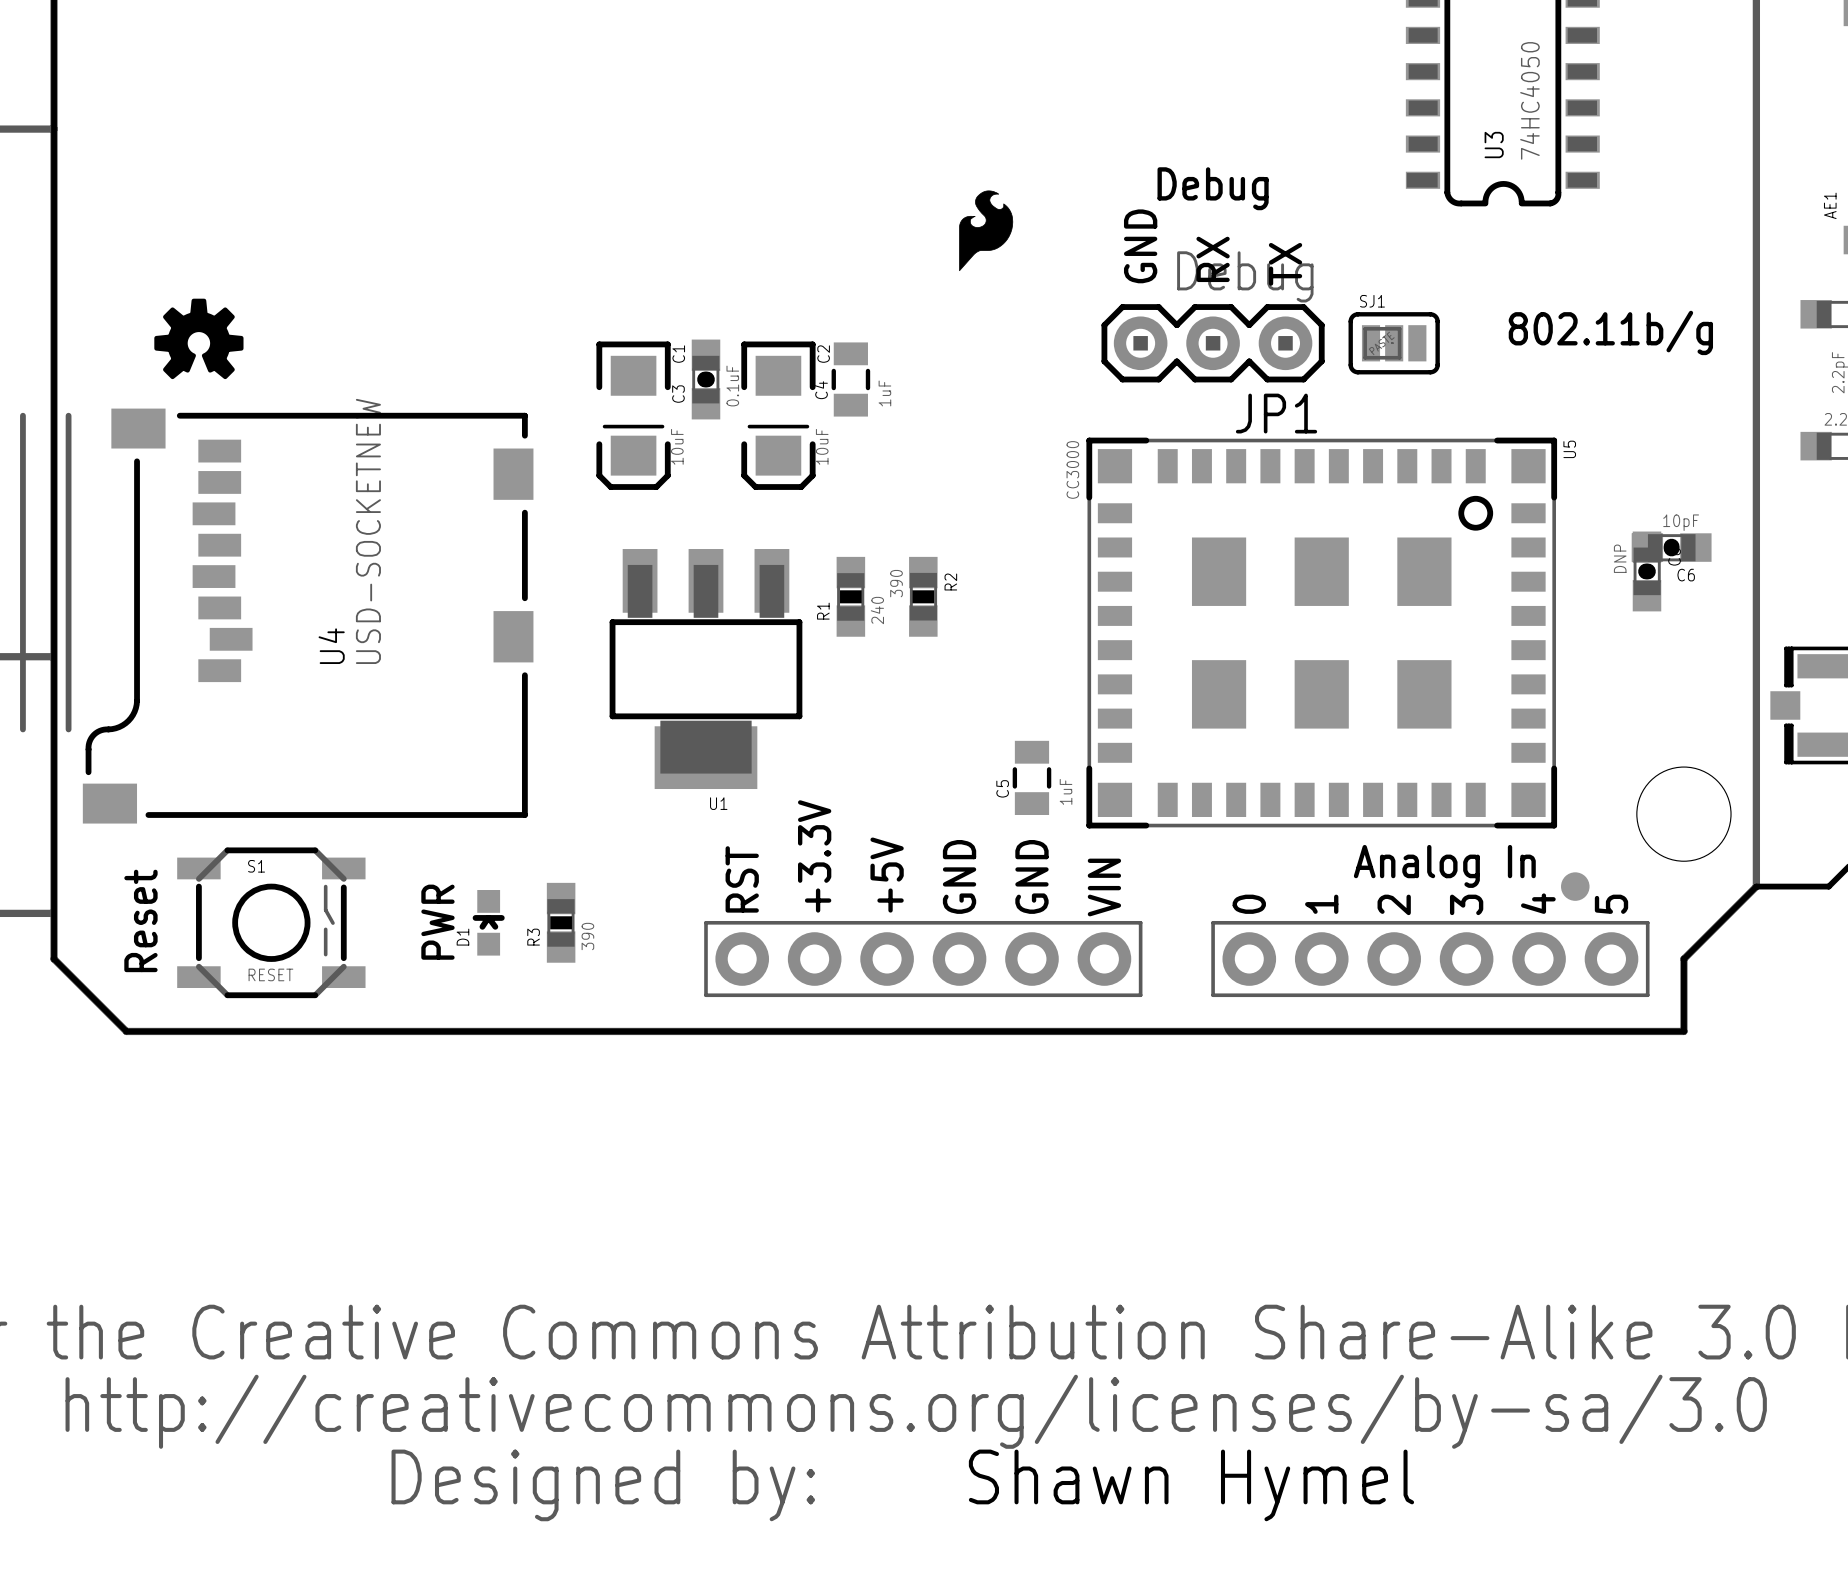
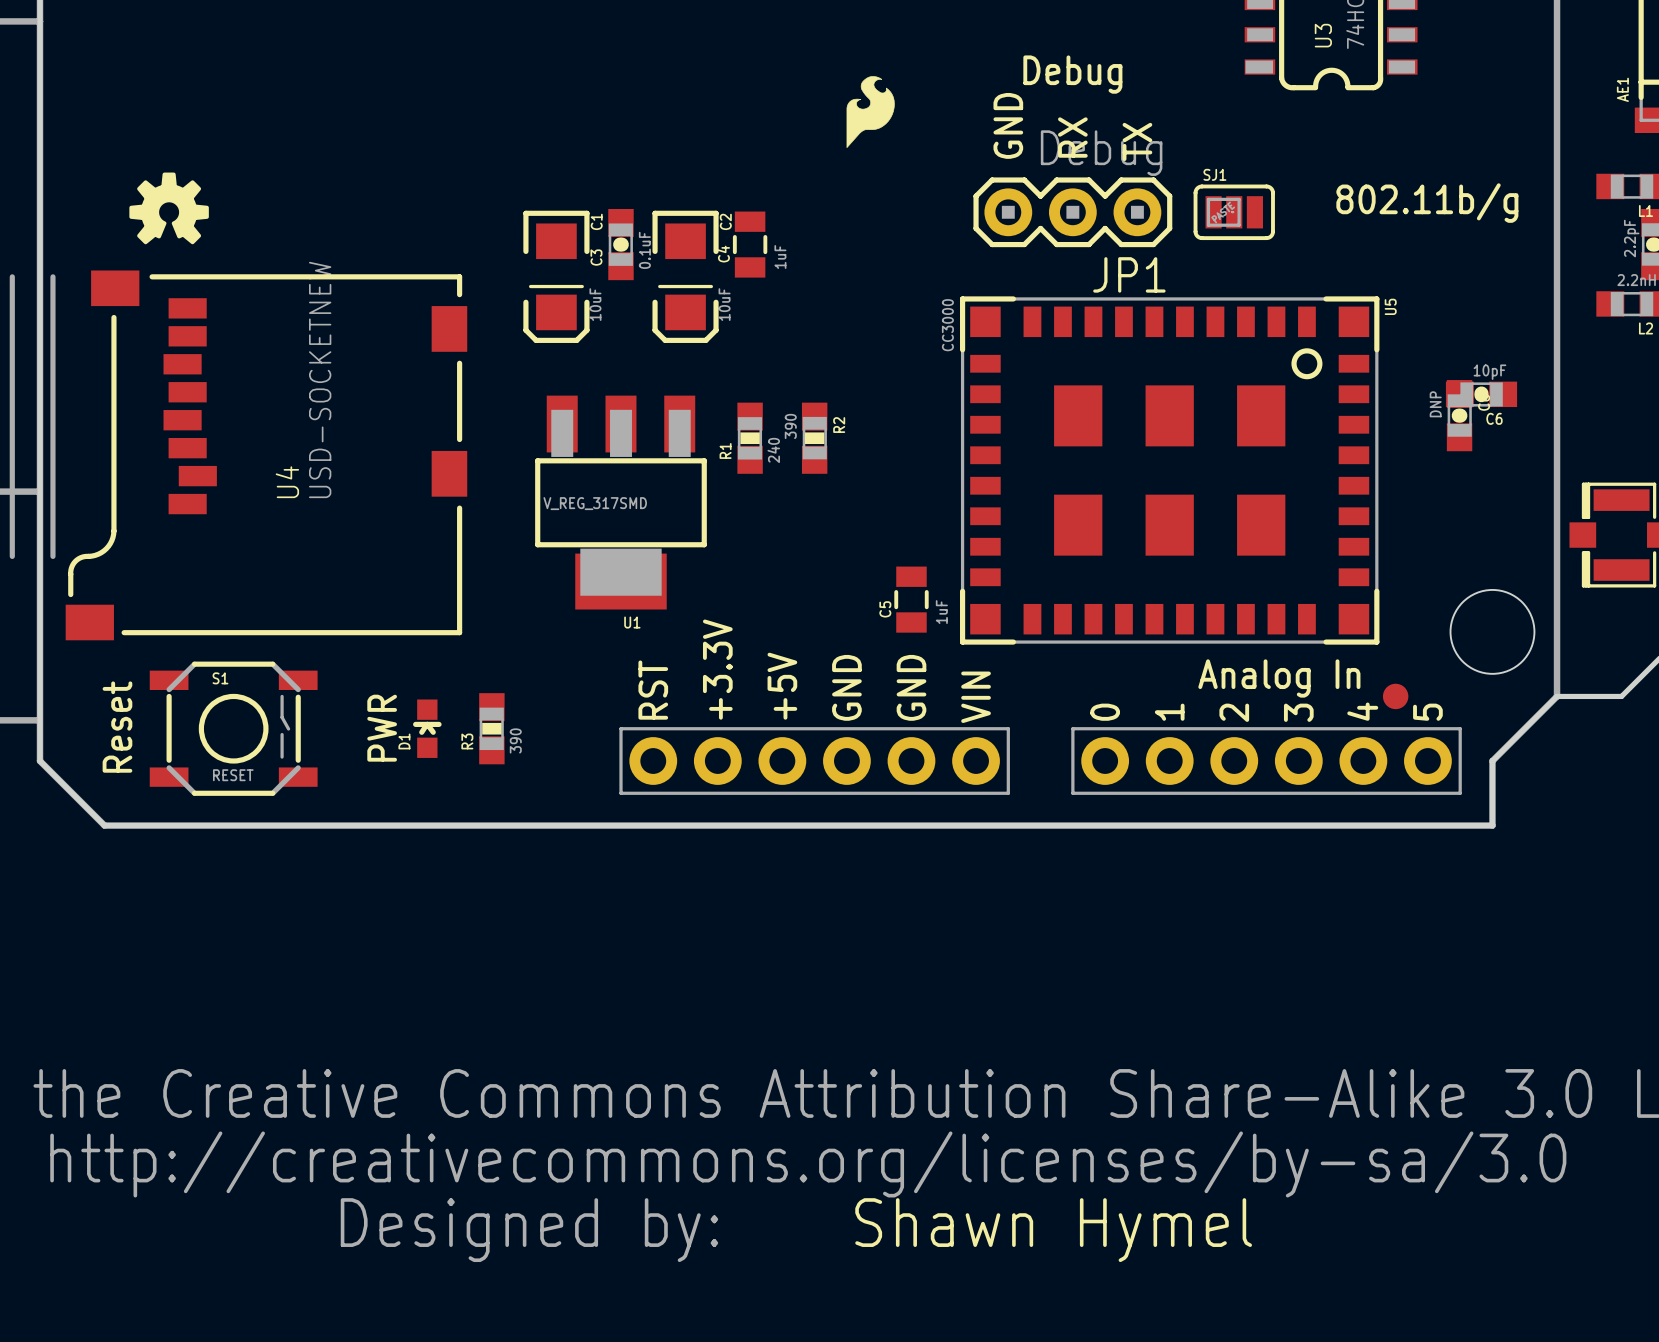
U1 value: none -> V_REG_317SMD (595, 503)

